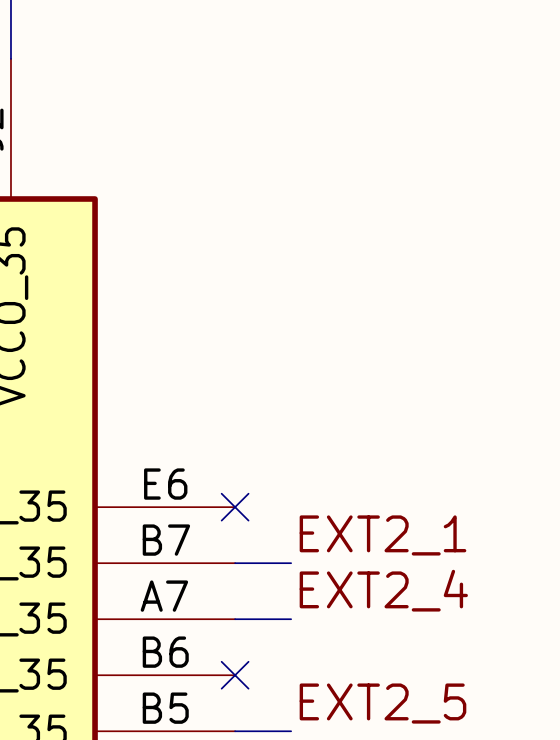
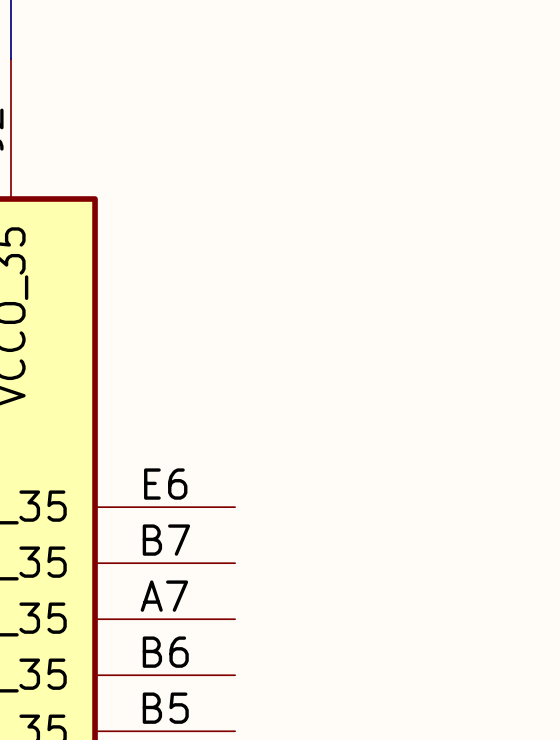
no-connect mark: (235, 507) -> none
label: EXT2_1 (382, 535) -> none
wire: (235, 563) (291, 563) -> none
label: EXT2_4 (383, 590) -> none
wire: (235, 619) (291, 619) -> none
no-connect mark: (235, 675) -> none
label: EXT2_5 (382, 703) -> none
wire: (235, 731) (291, 731) -> none

